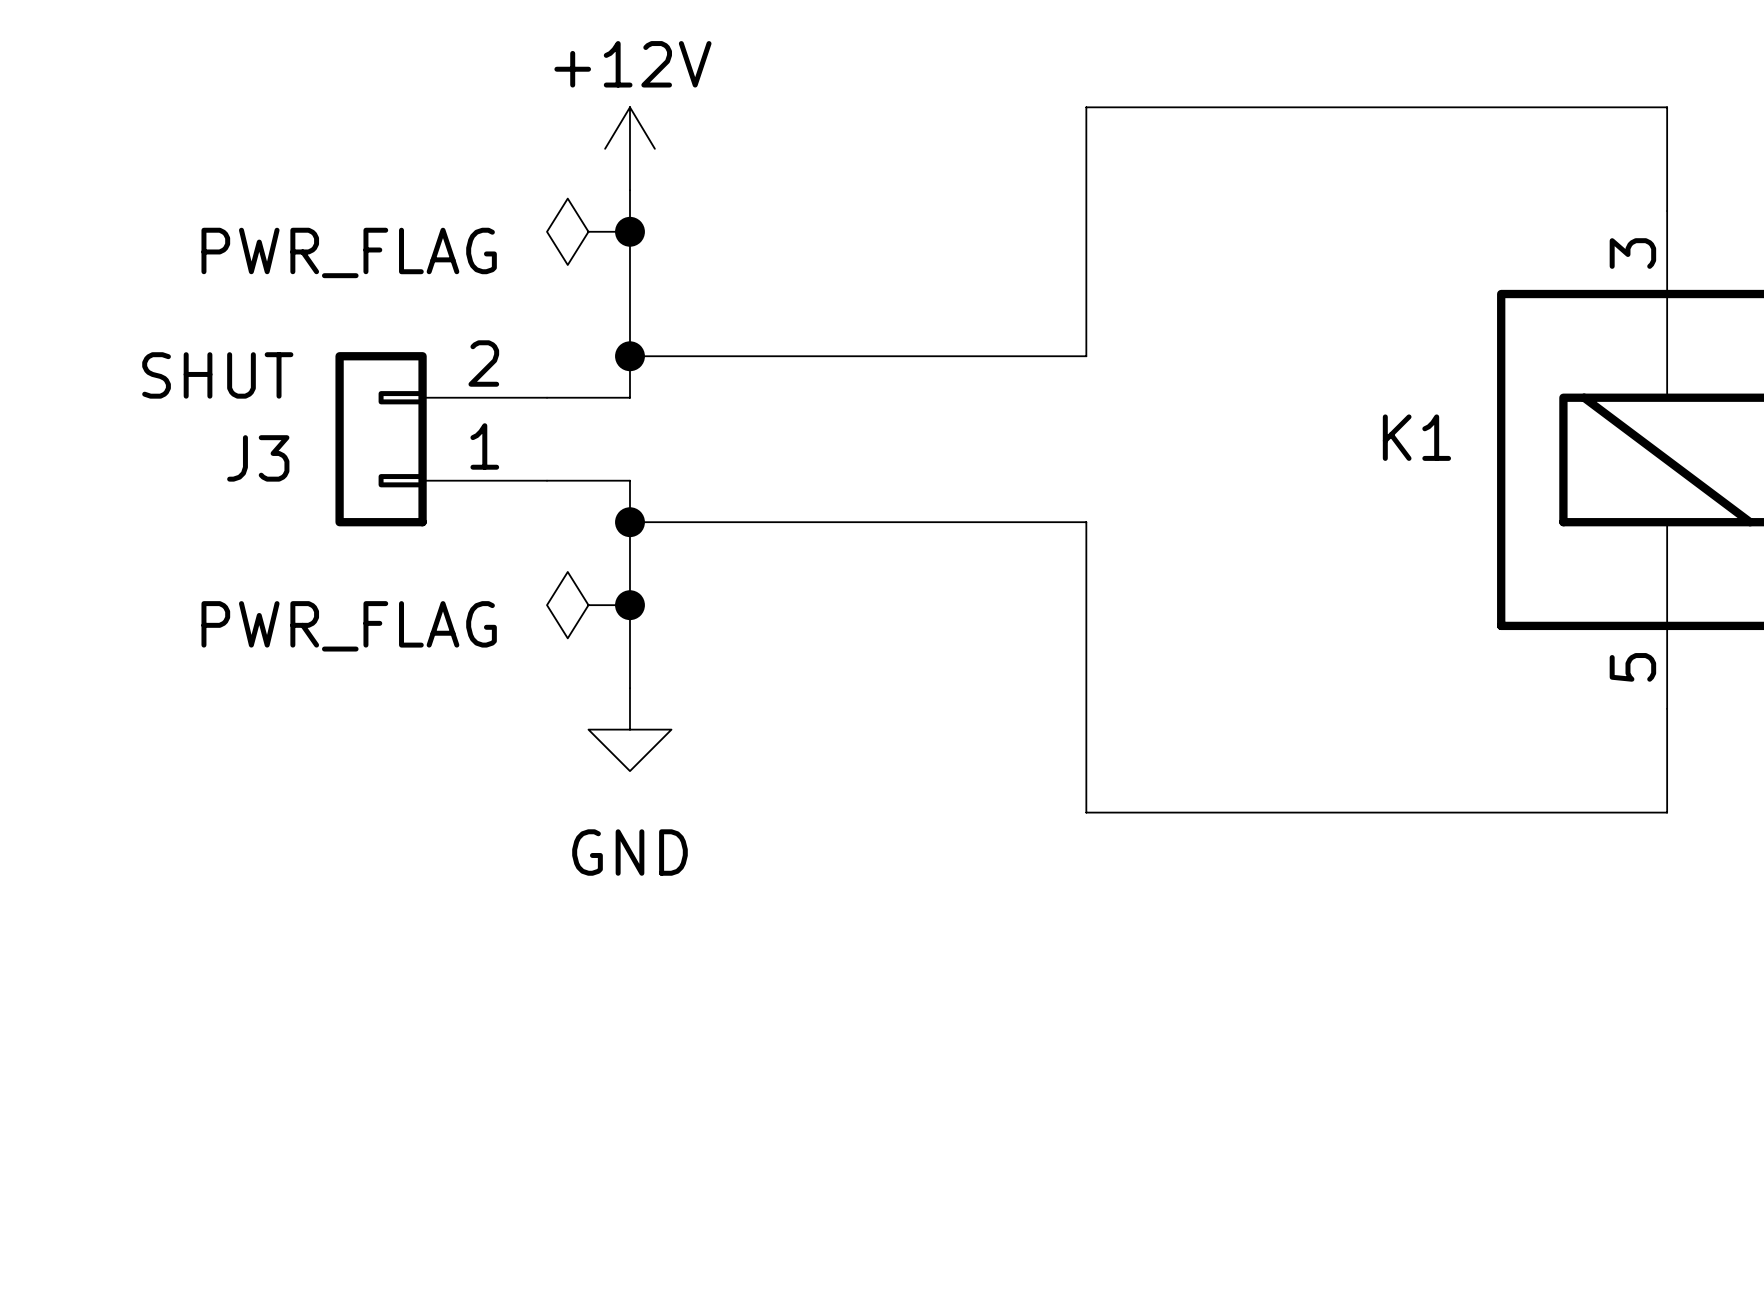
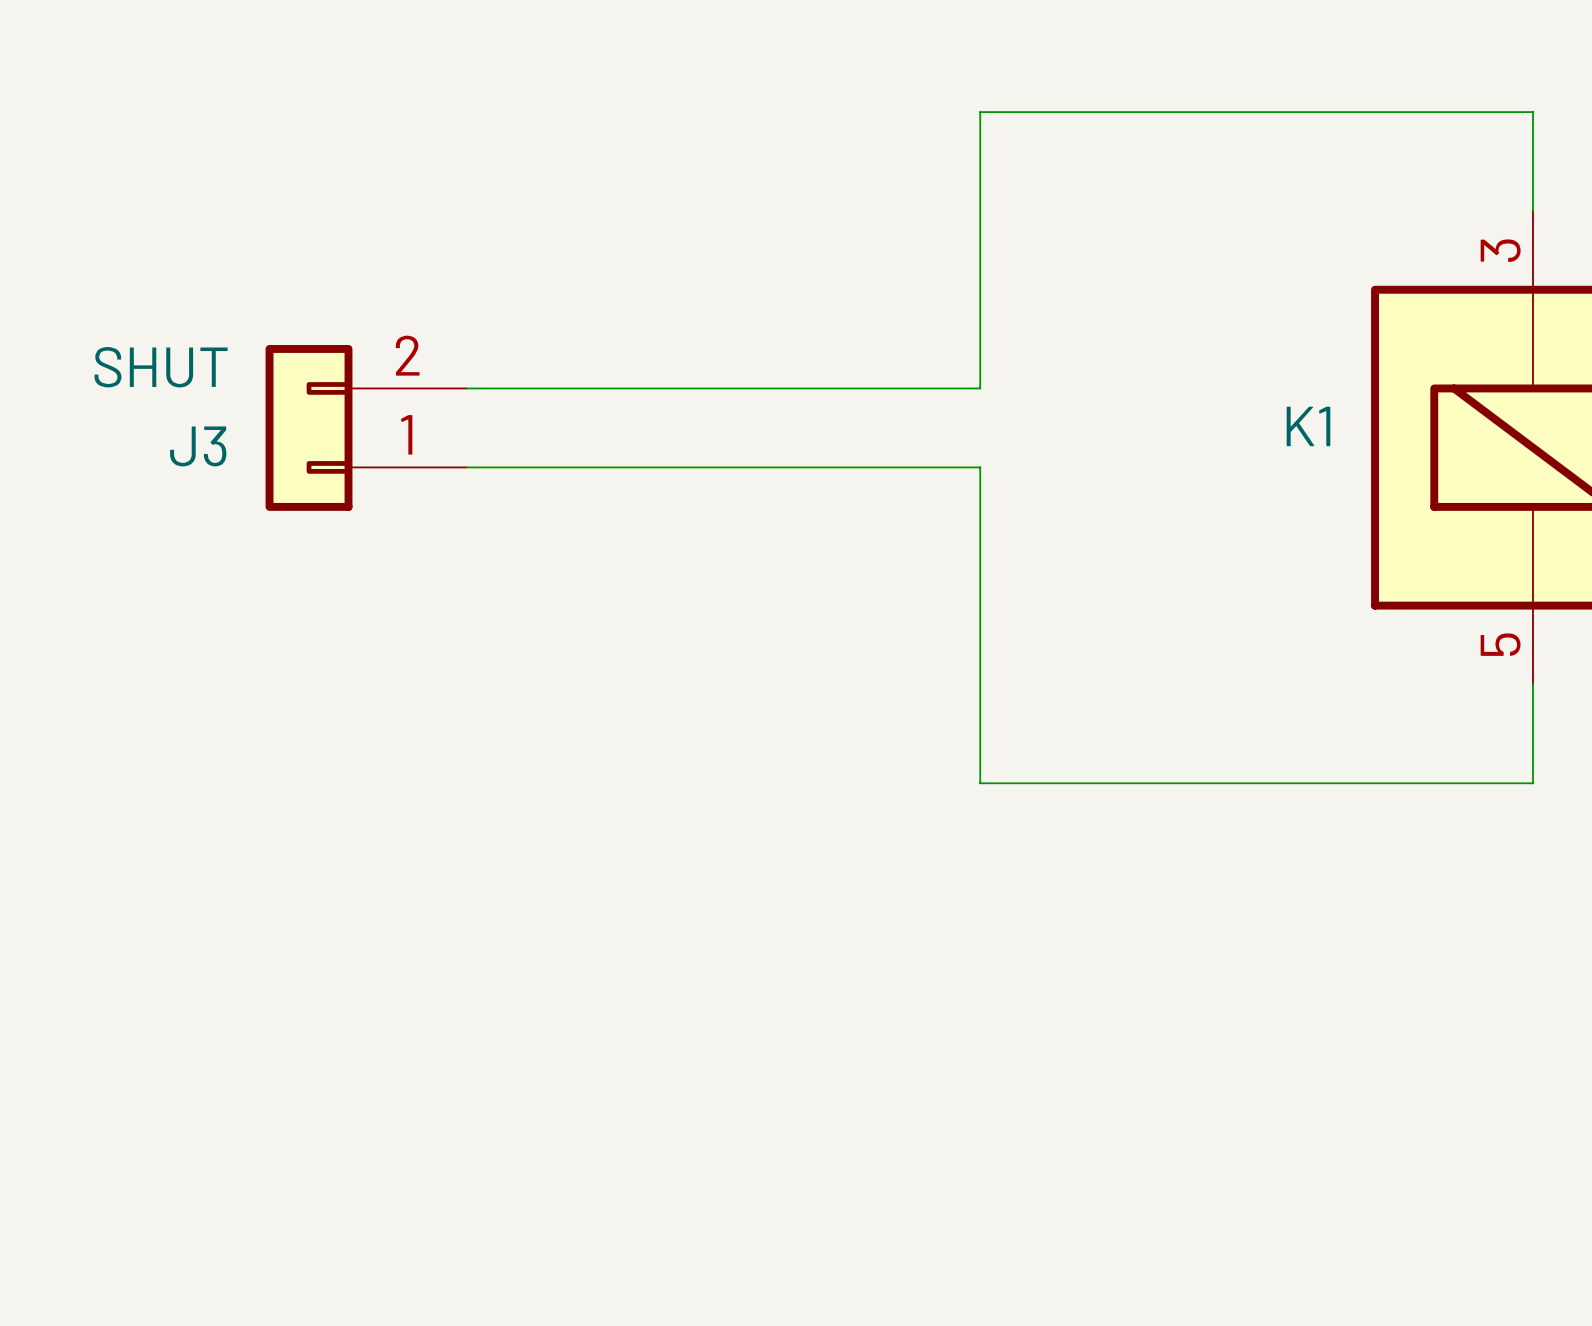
power symbol: +12V (629, 148) -> none
wire: (629, 190) (629, 397) -> none
power symbol: PWR_FLAG (588, 231) -> none
junction: (629, 231) -> none
wire: (629, 356) (1086, 356) -> (545, 388) (980, 388) (980, 348)
junction: (629, 356) -> none
wire: (629, 480) (629, 688) -> none
wire: (629, 522) (1086, 522) -> (545, 467) (980, 467) (980, 506)
junction: (629, 522) -> none
power symbol: PWR_FLAG (588, 605) -> none
junction: (629, 605) -> none
power symbol: GND (629, 729) -> none

